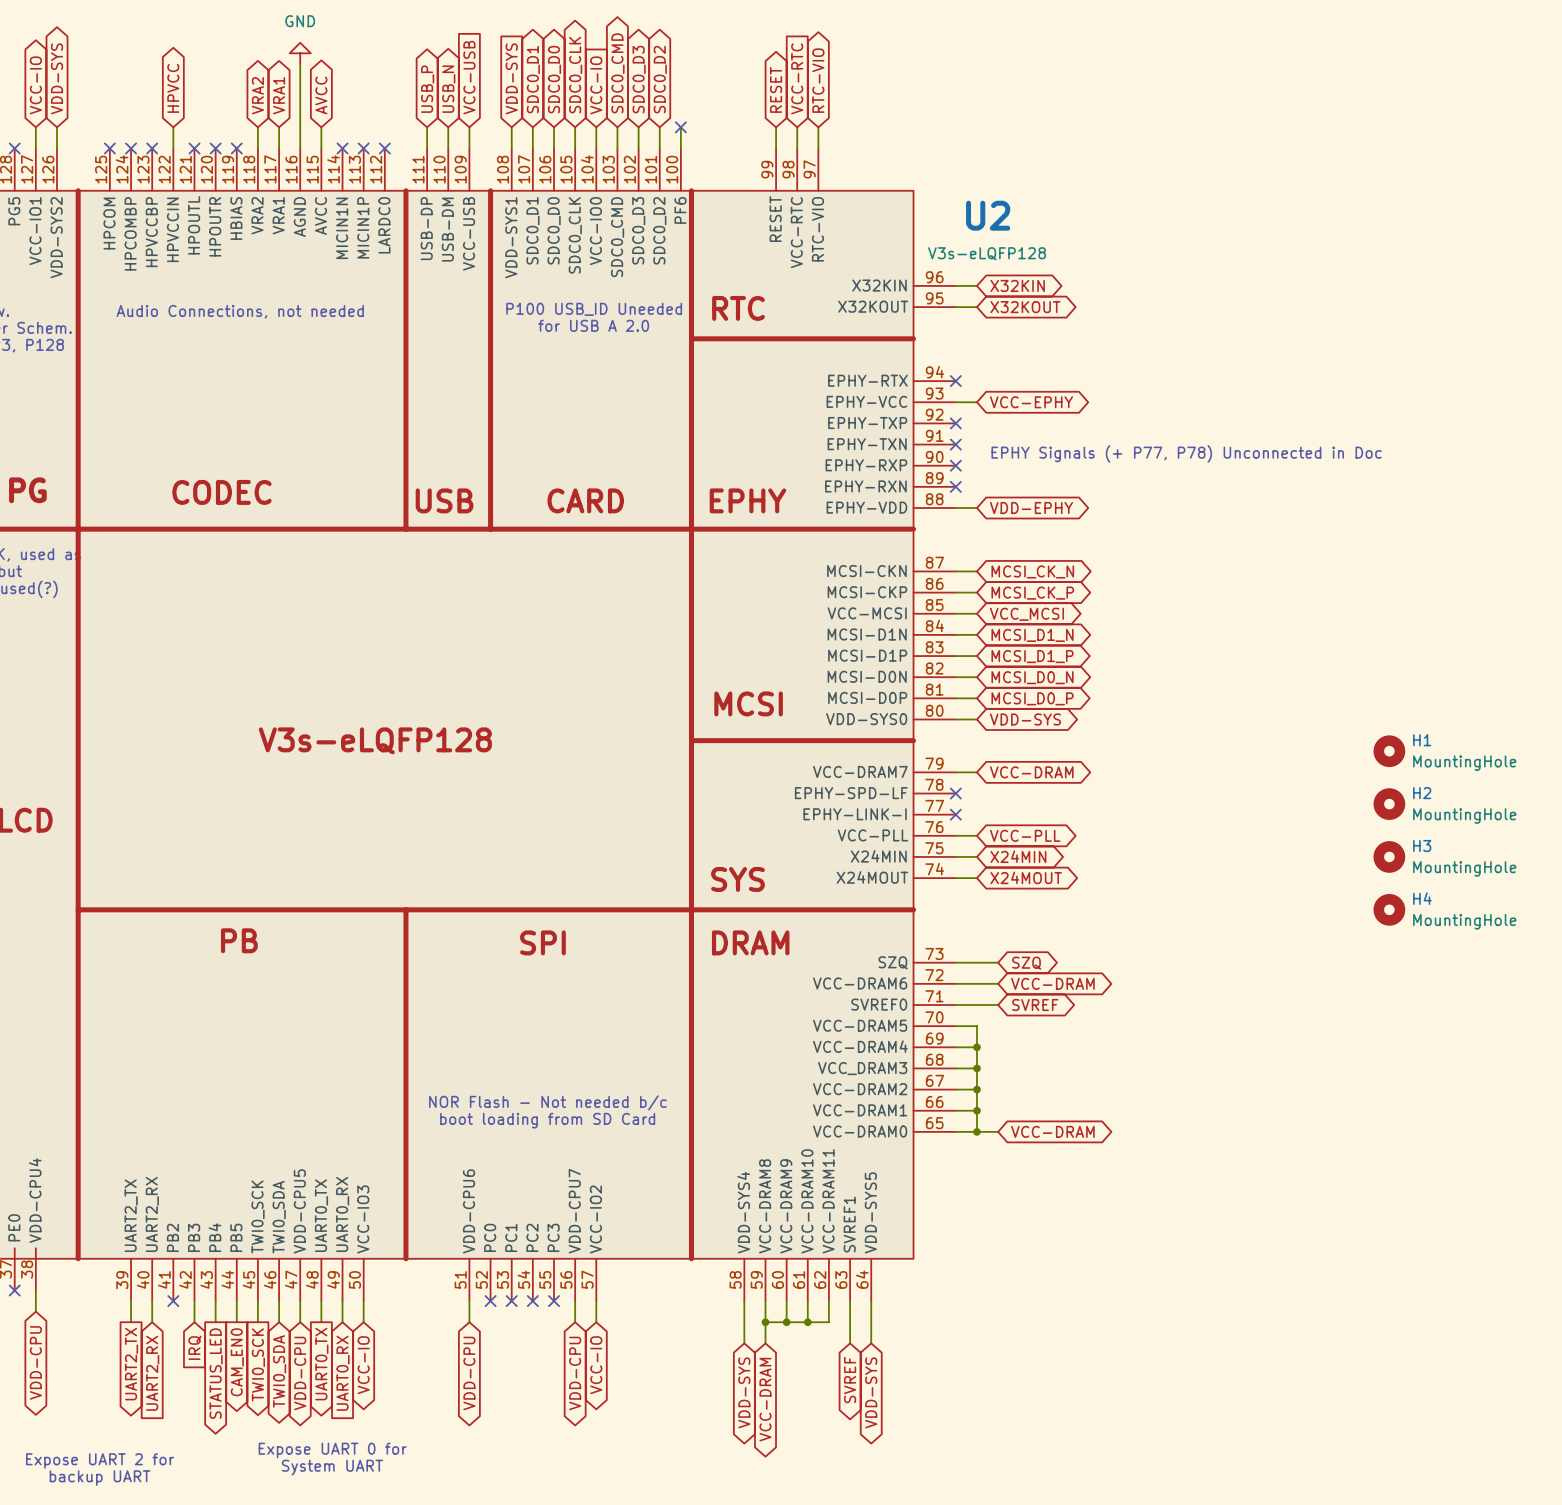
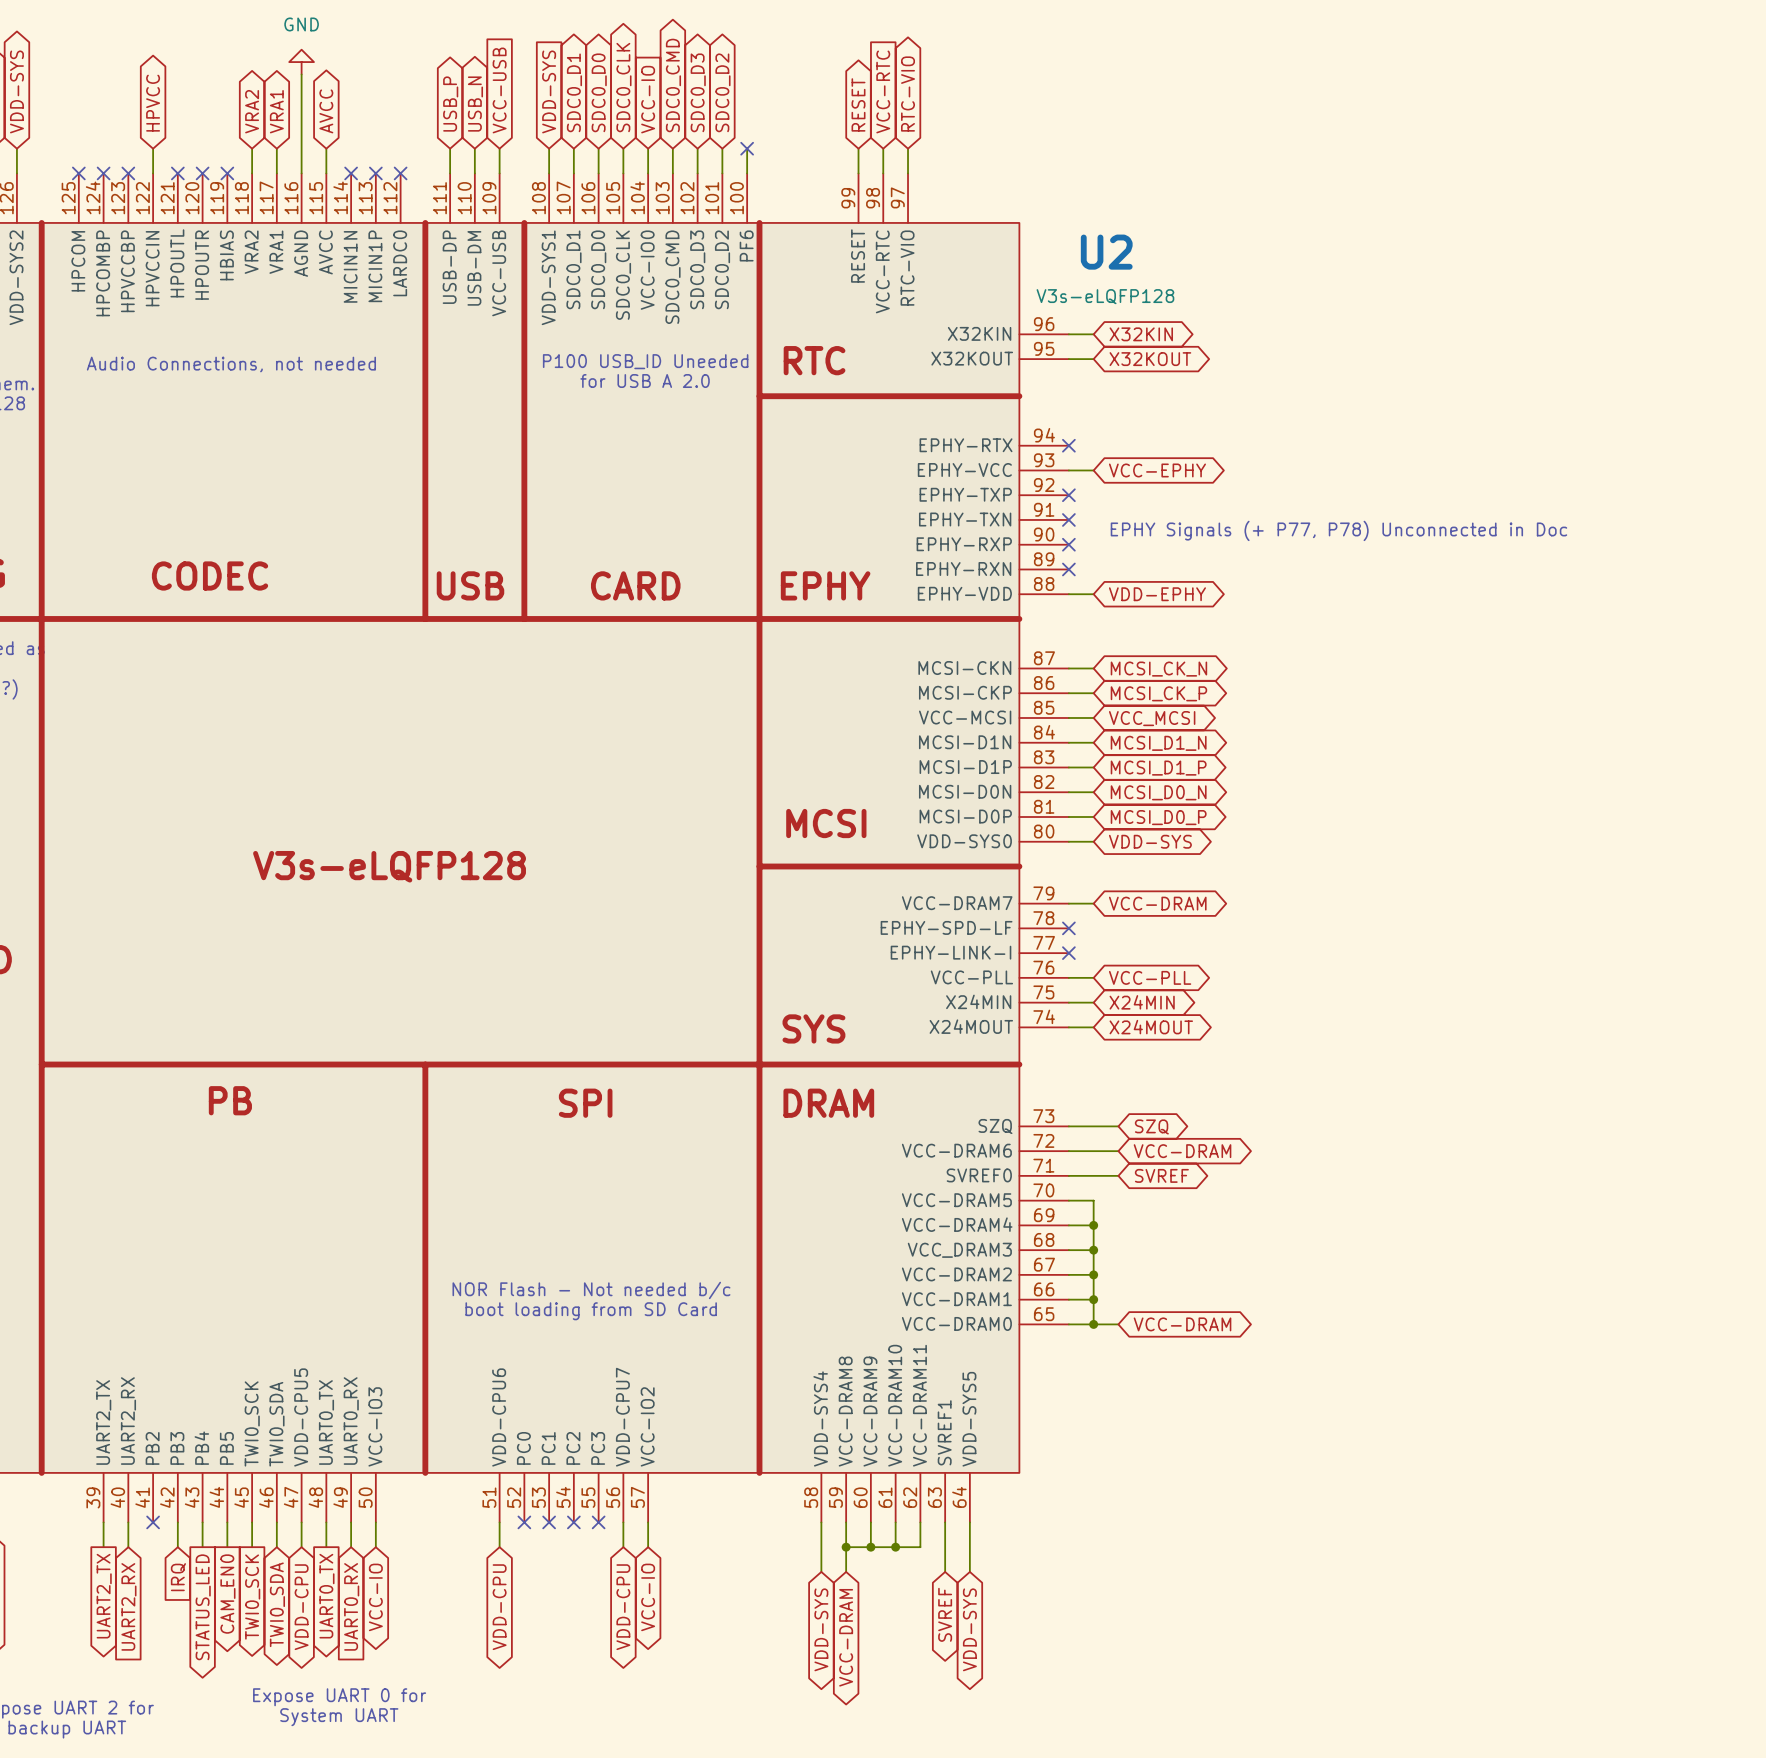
H1: MountingHole (1389, 751) -> none
H2: MountingHole (1389, 804) -> none
H3: MountingHole (1389, 856) -> none
H4: MountingHole (1389, 909) -> none

